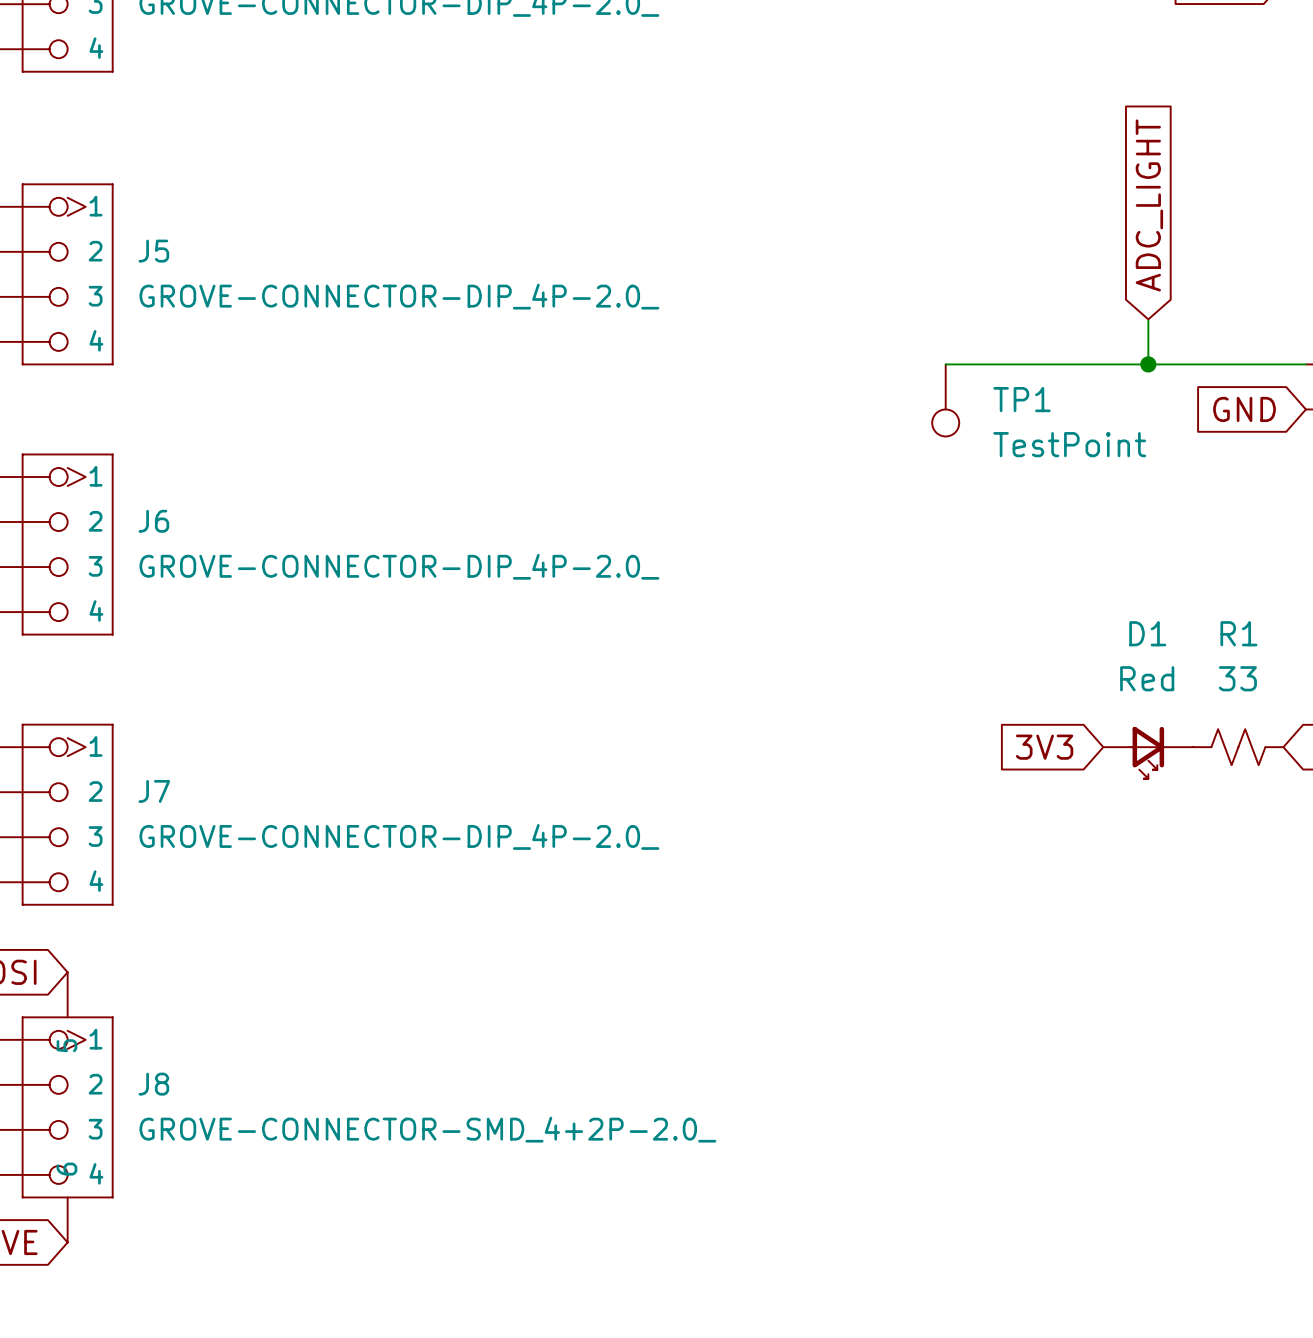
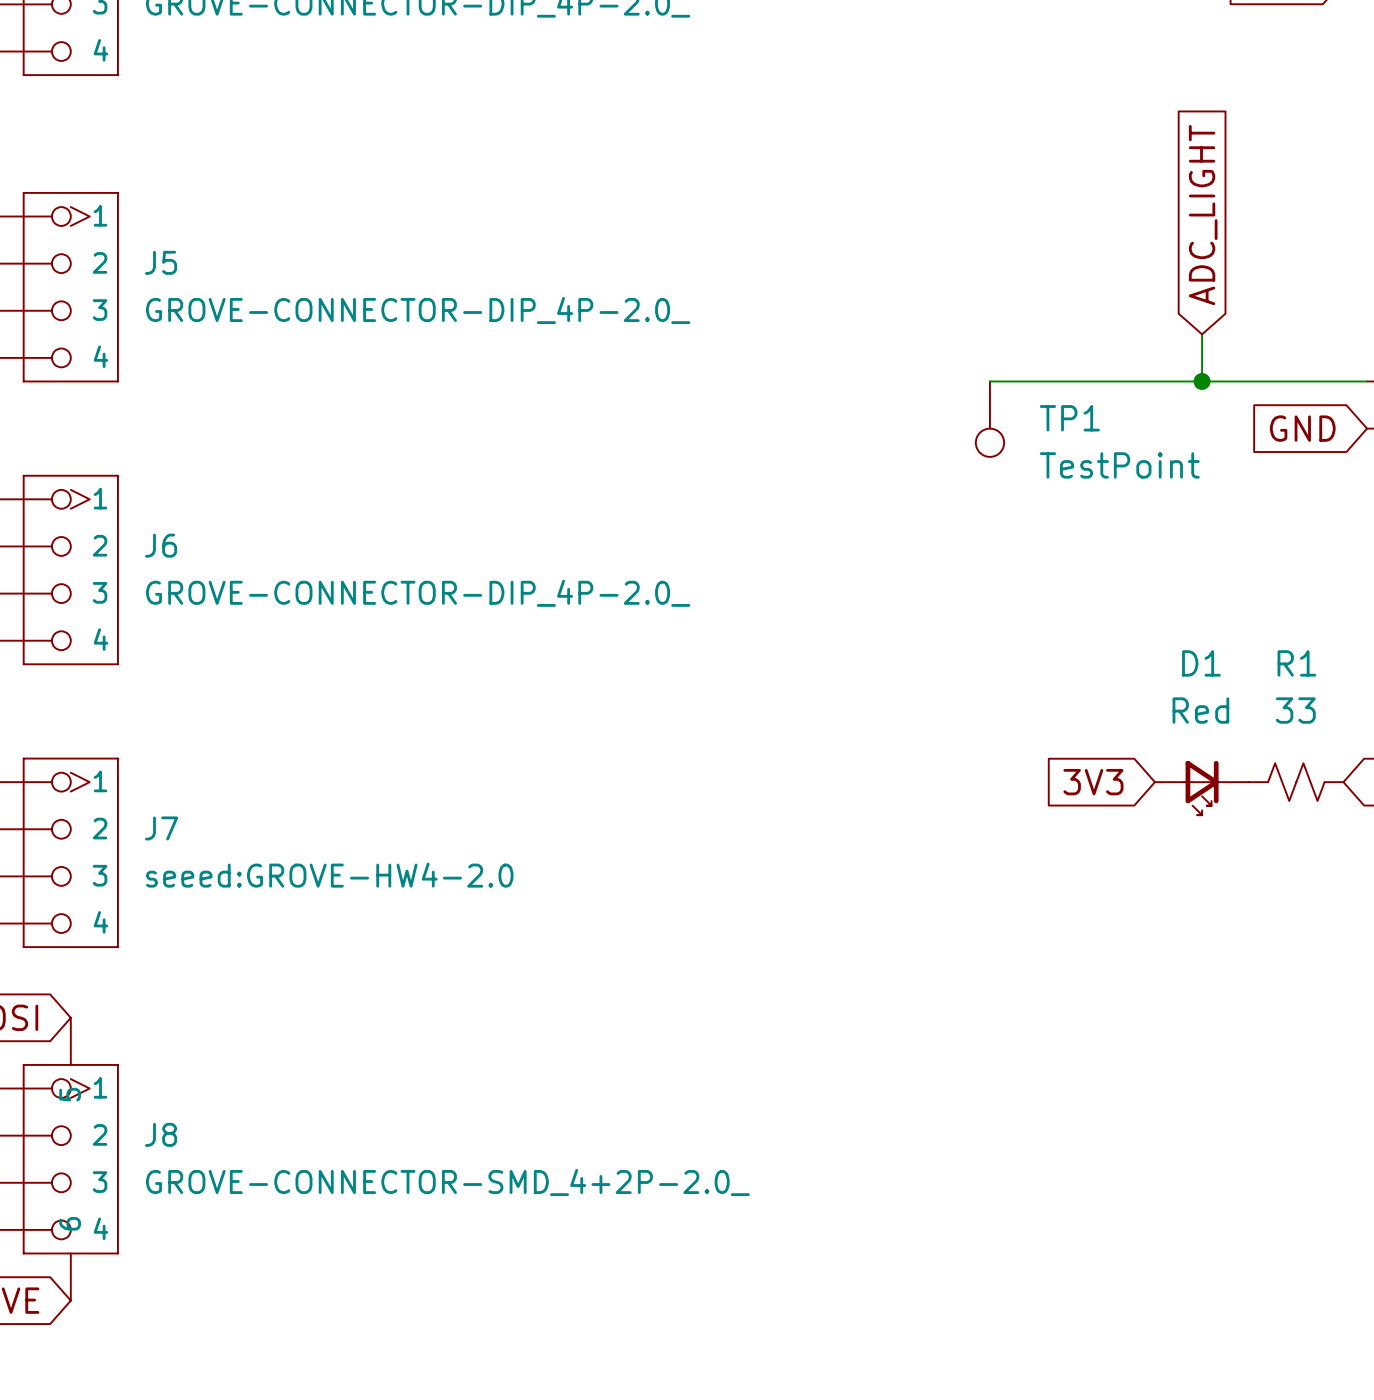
J7 value: GROVE-CONNECTOR-DIP_4P-2.0_ (399, 836) -> seeed:GROVE-HW4-2.0 (329, 875)

